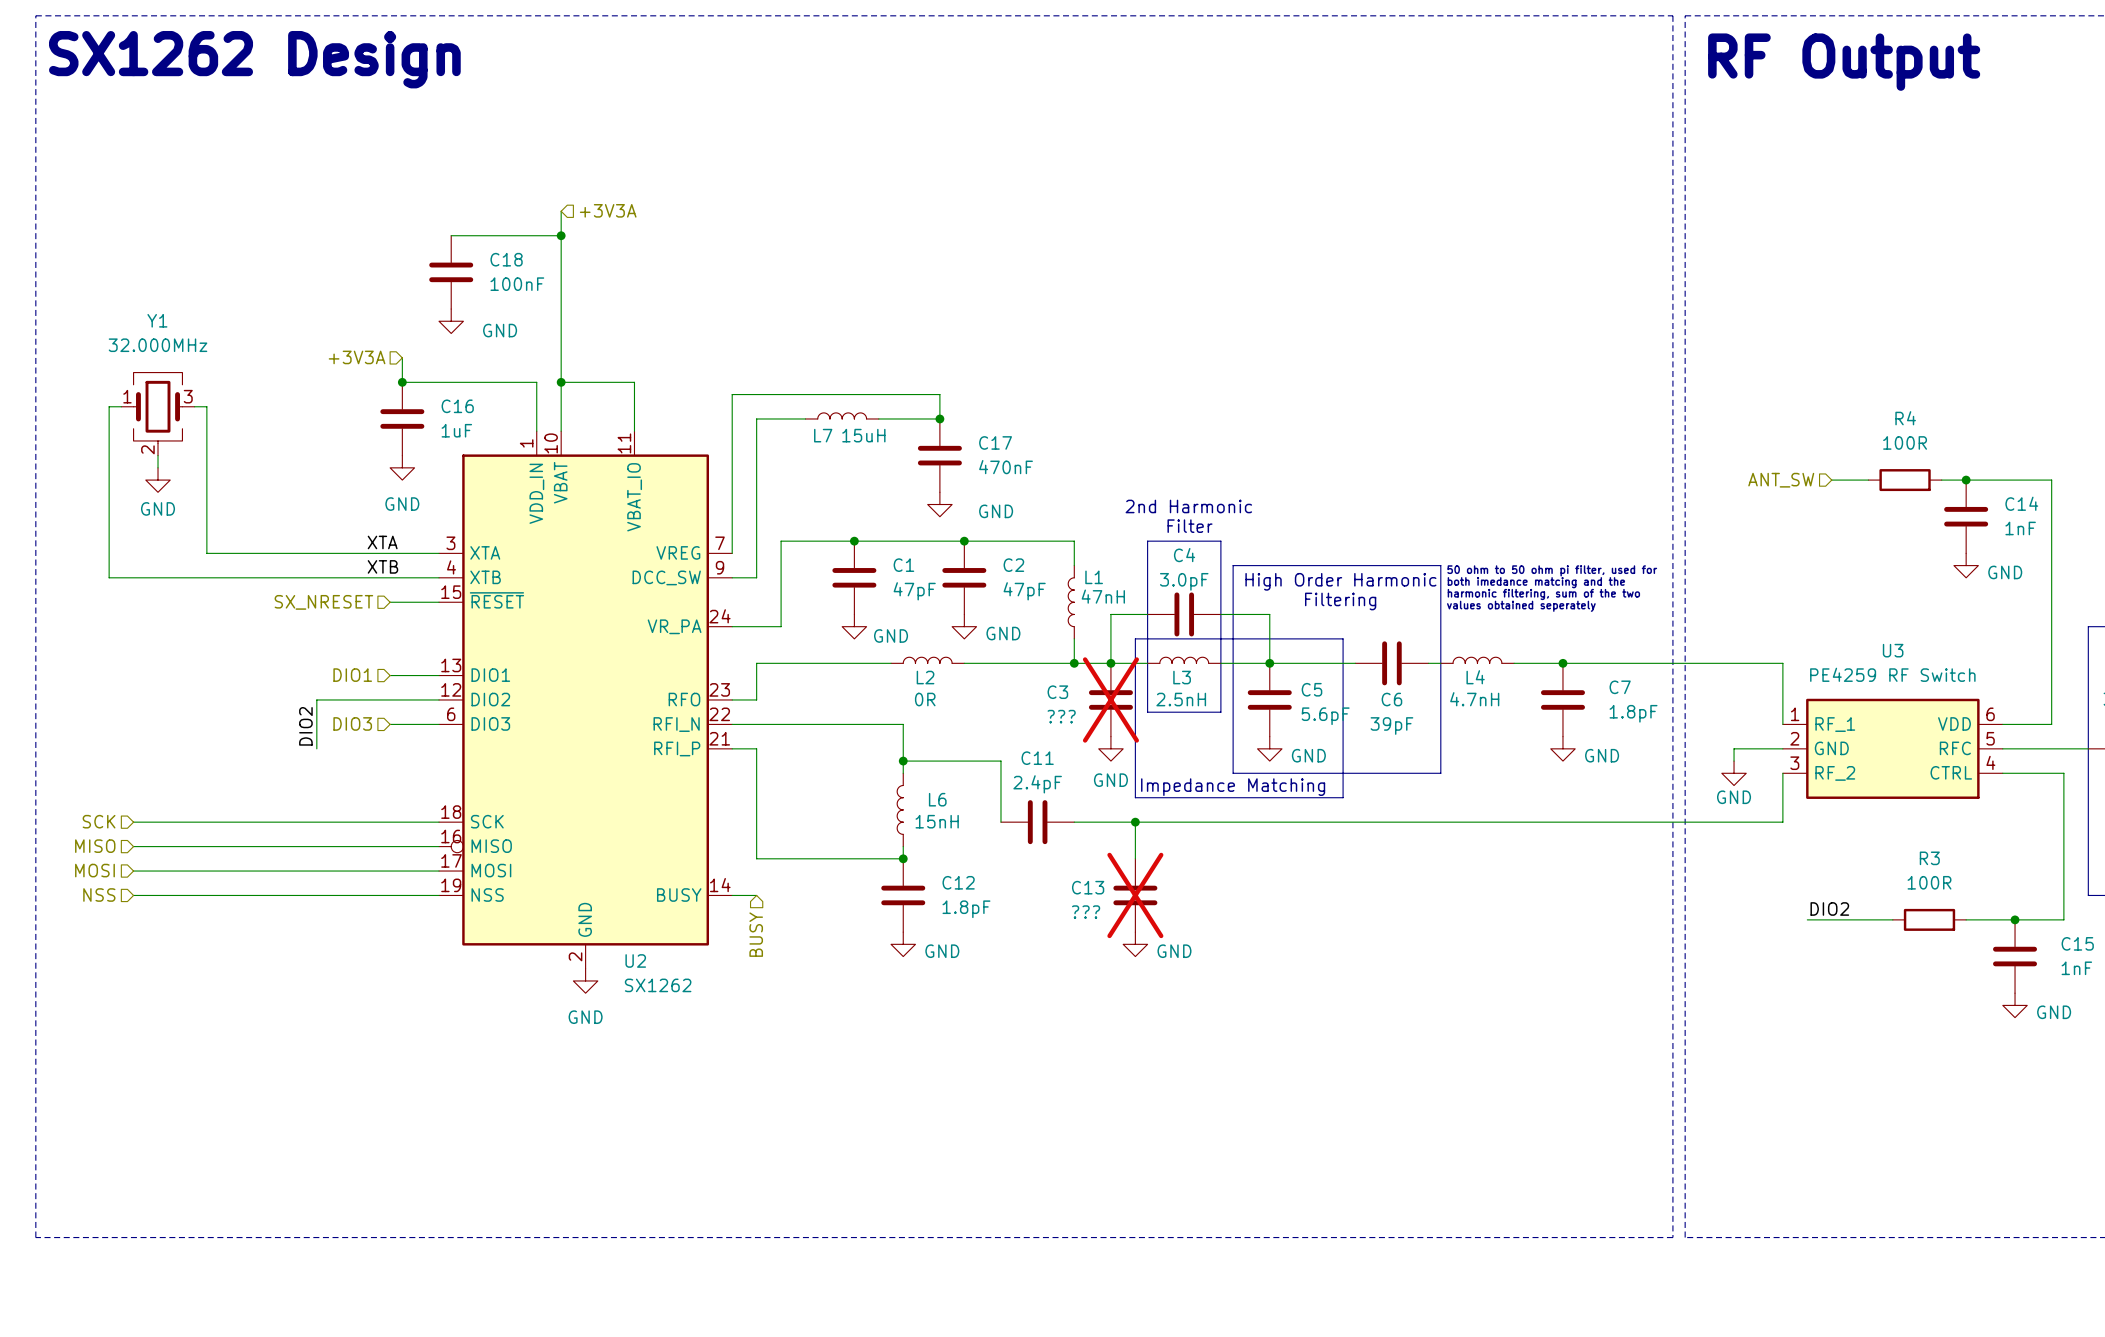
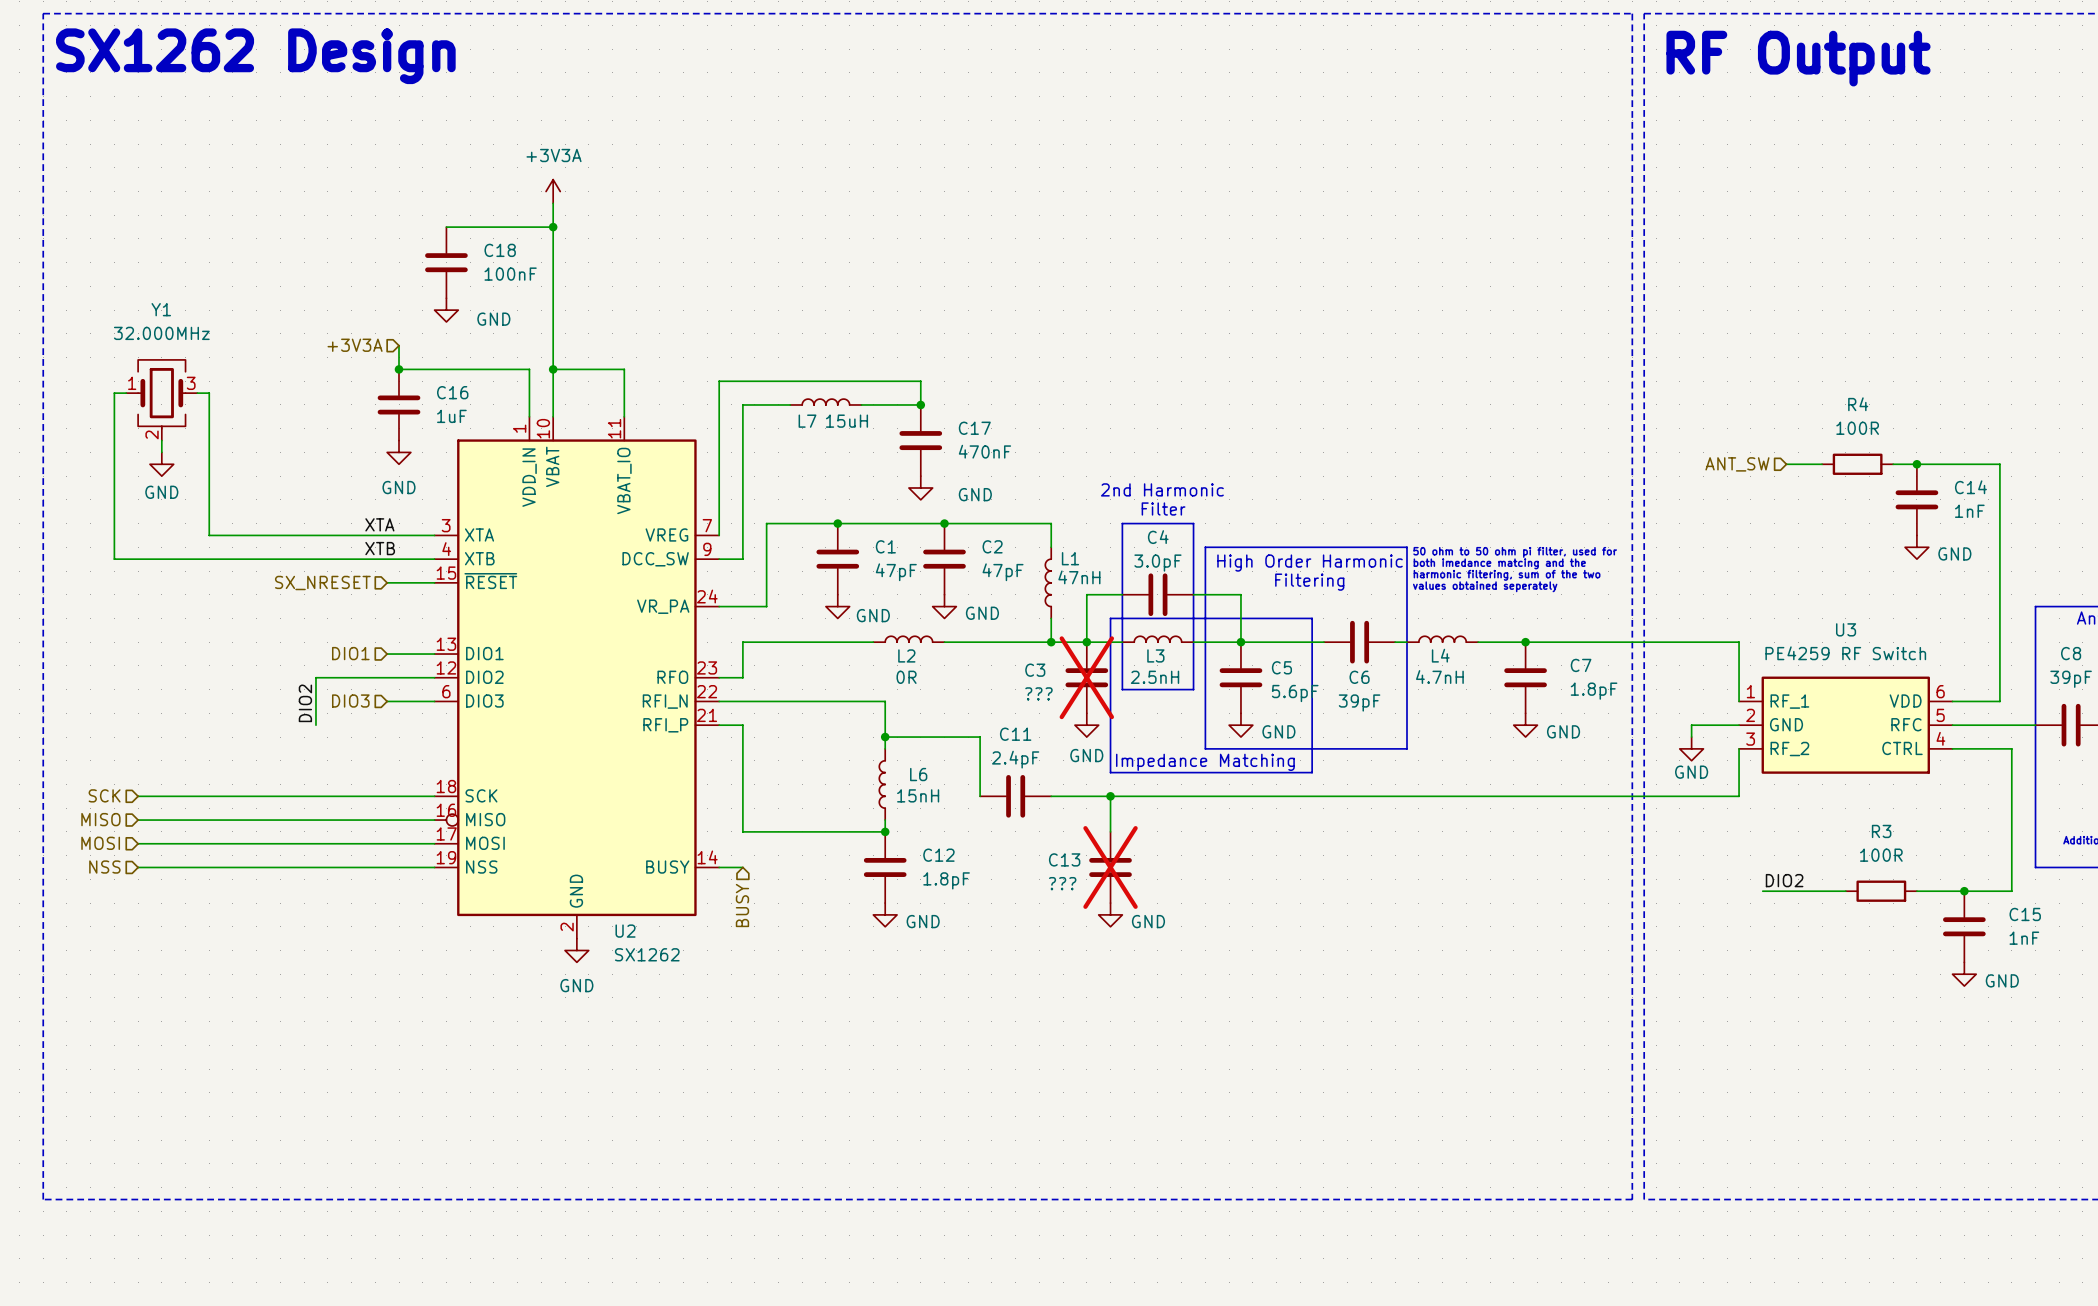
power symbol: none -> +3V3A (553, 191)
hierarchical label: +3V3A (608, 210) -> none

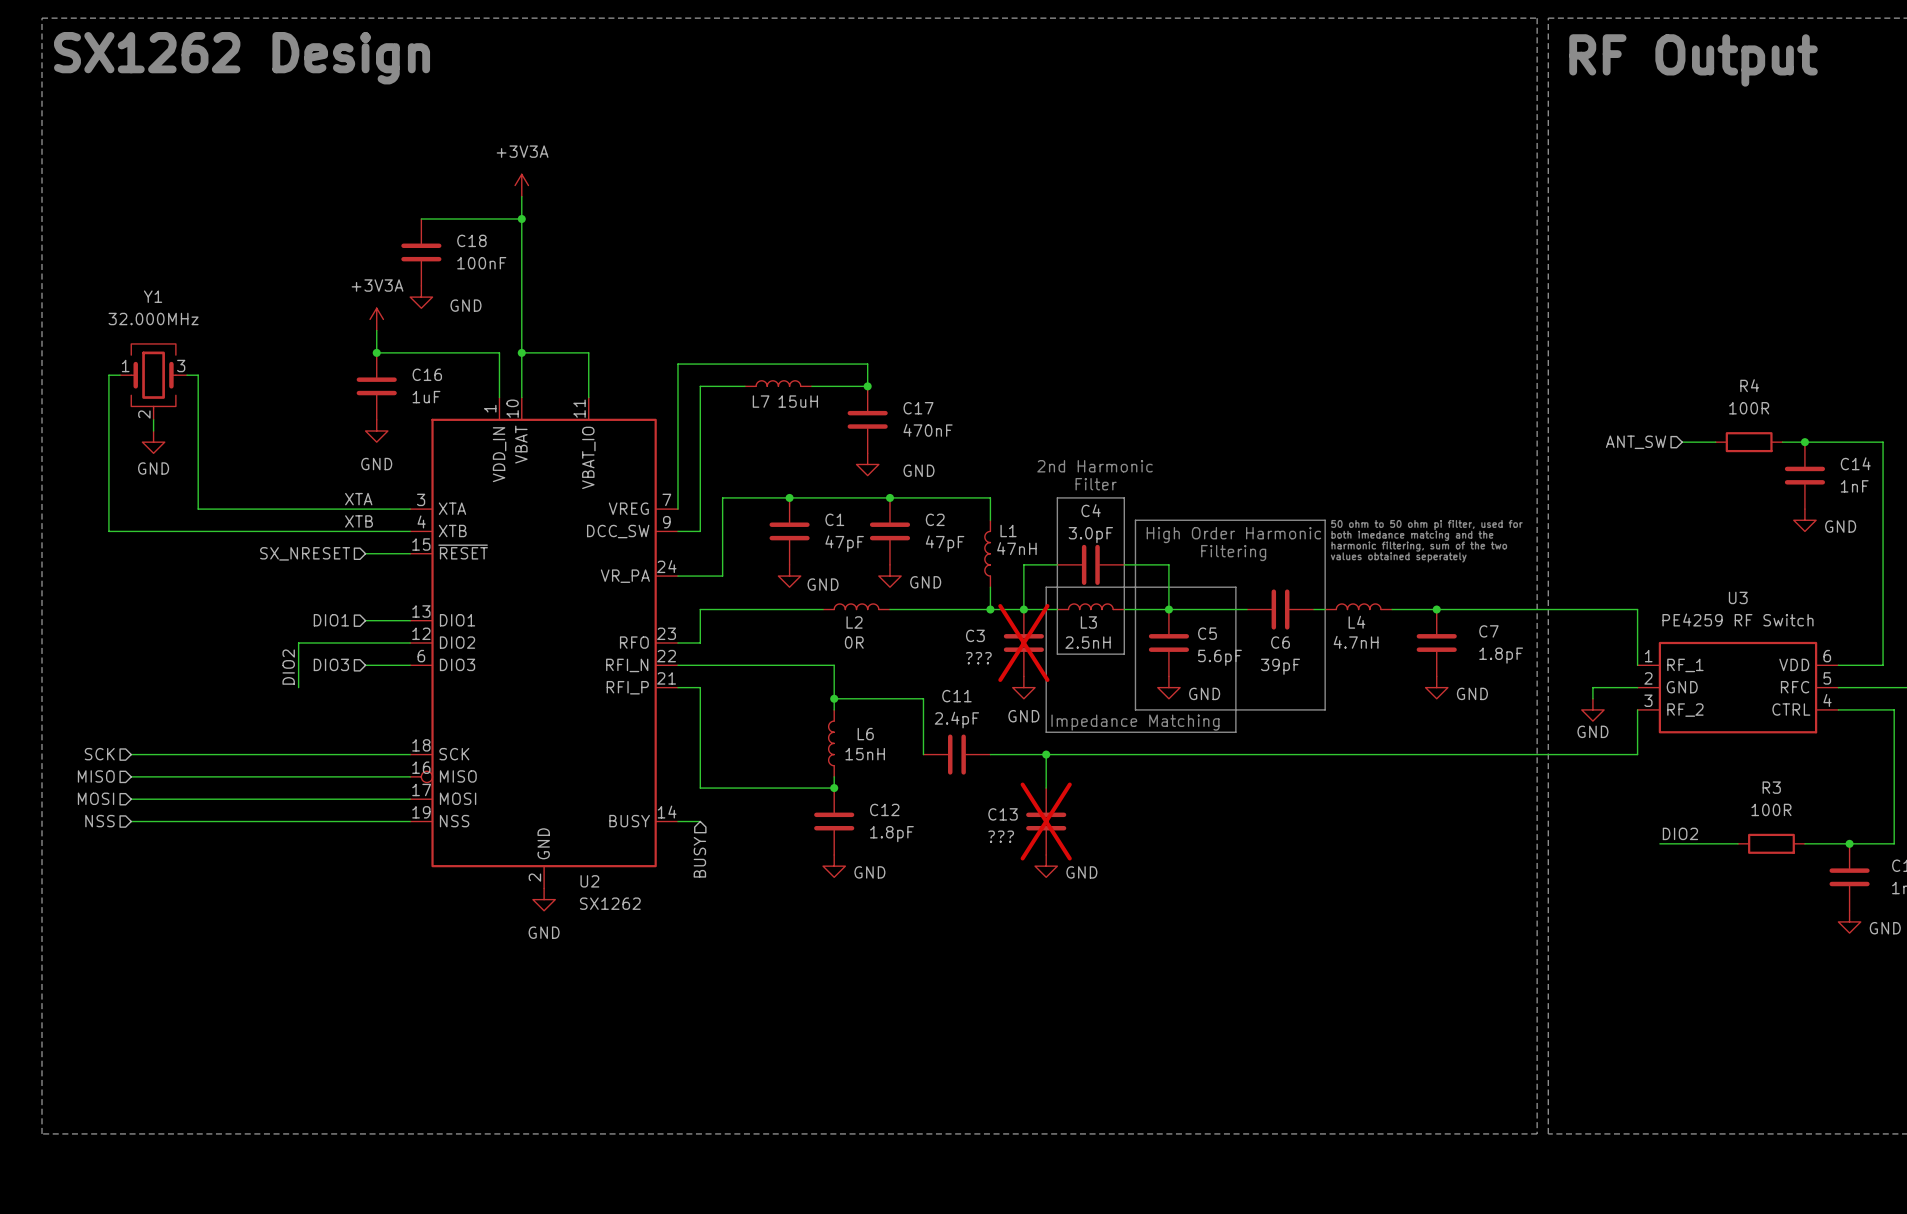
power symbol: none -> +3V3A (376, 319)
hierarchical label: +3V3A (355, 345) -> none

